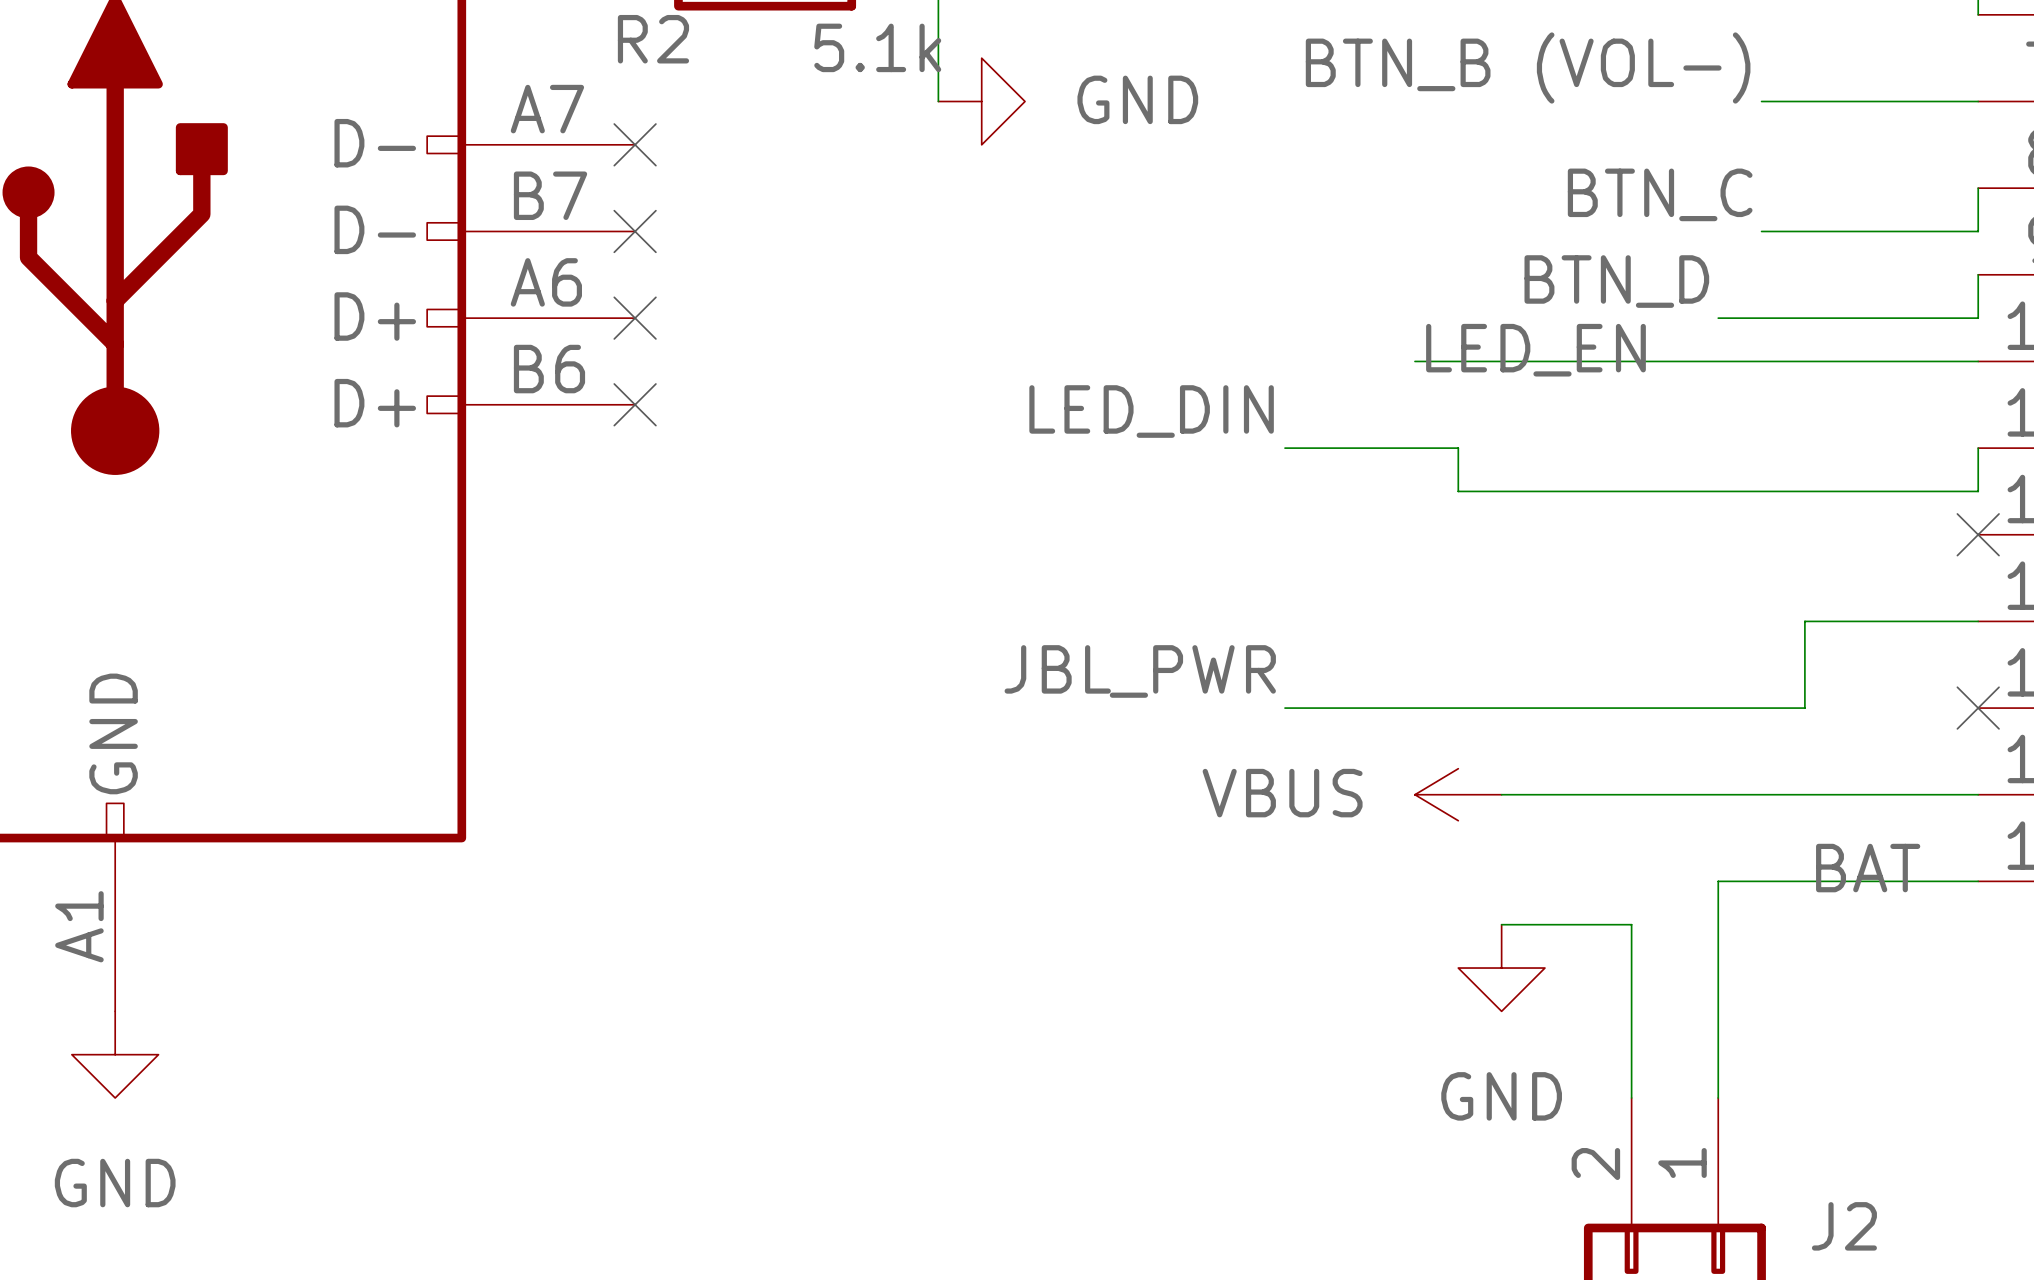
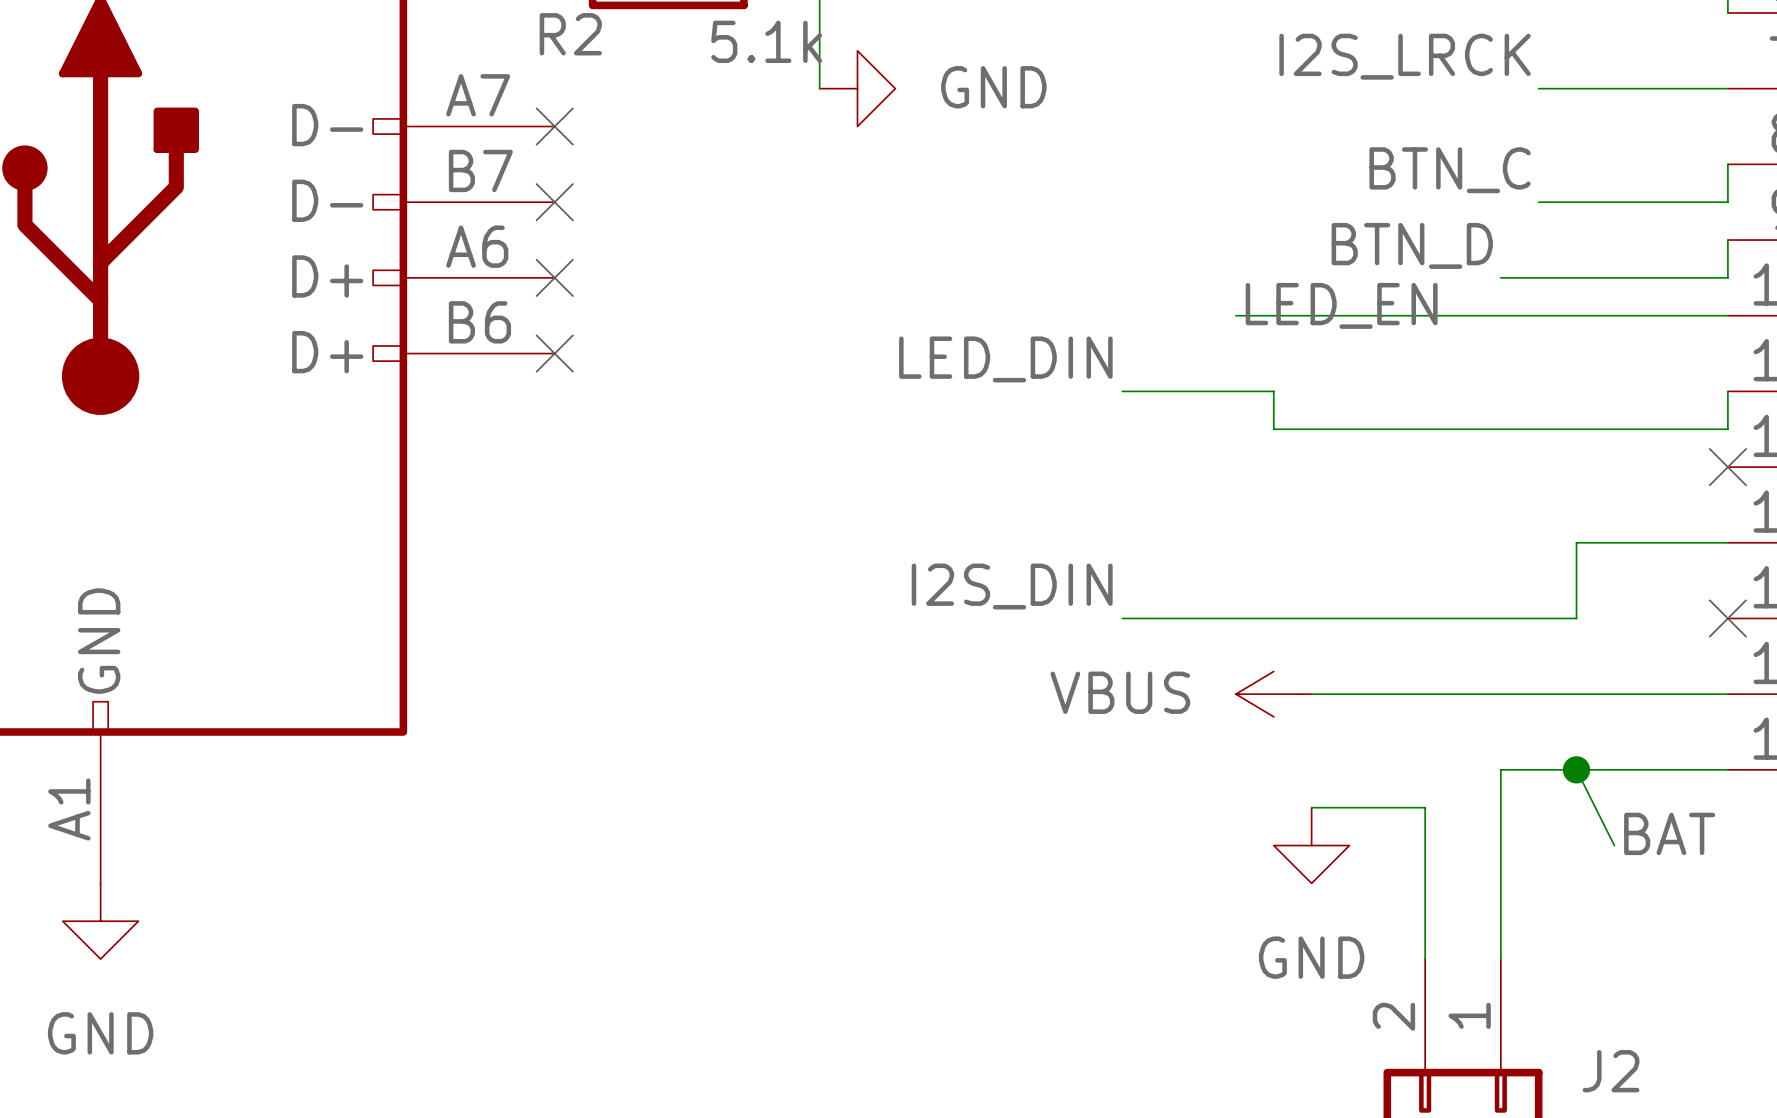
label: BTN_B (VOL-) (1528, 67) -> I2S_LRCK (1405, 56)
label: JBL_PWR (1140, 671) -> I2S_DIN (1012, 586)
label position: BAT (1868, 868) -> BAT (1669, 833)
wire: none -> (1576, 769) (1614, 845)
junction: none -> (1576, 769)

